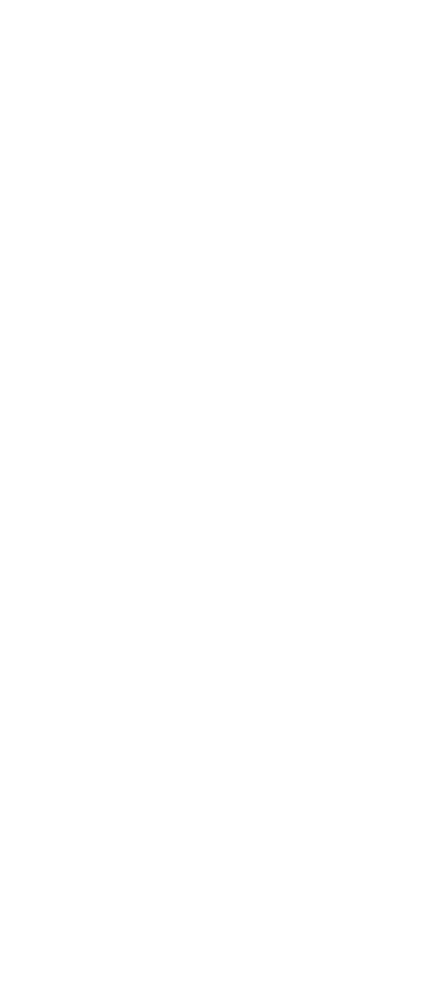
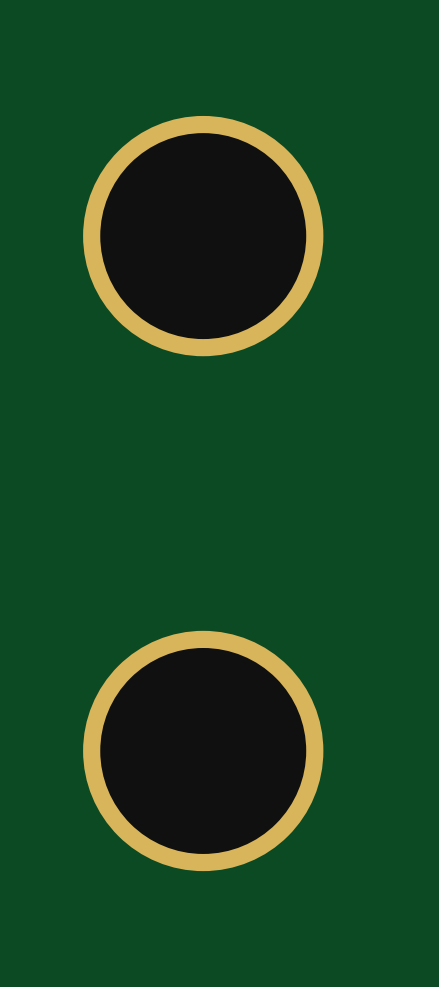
part: none -> (203, 236)
part: none -> (203, 750)

